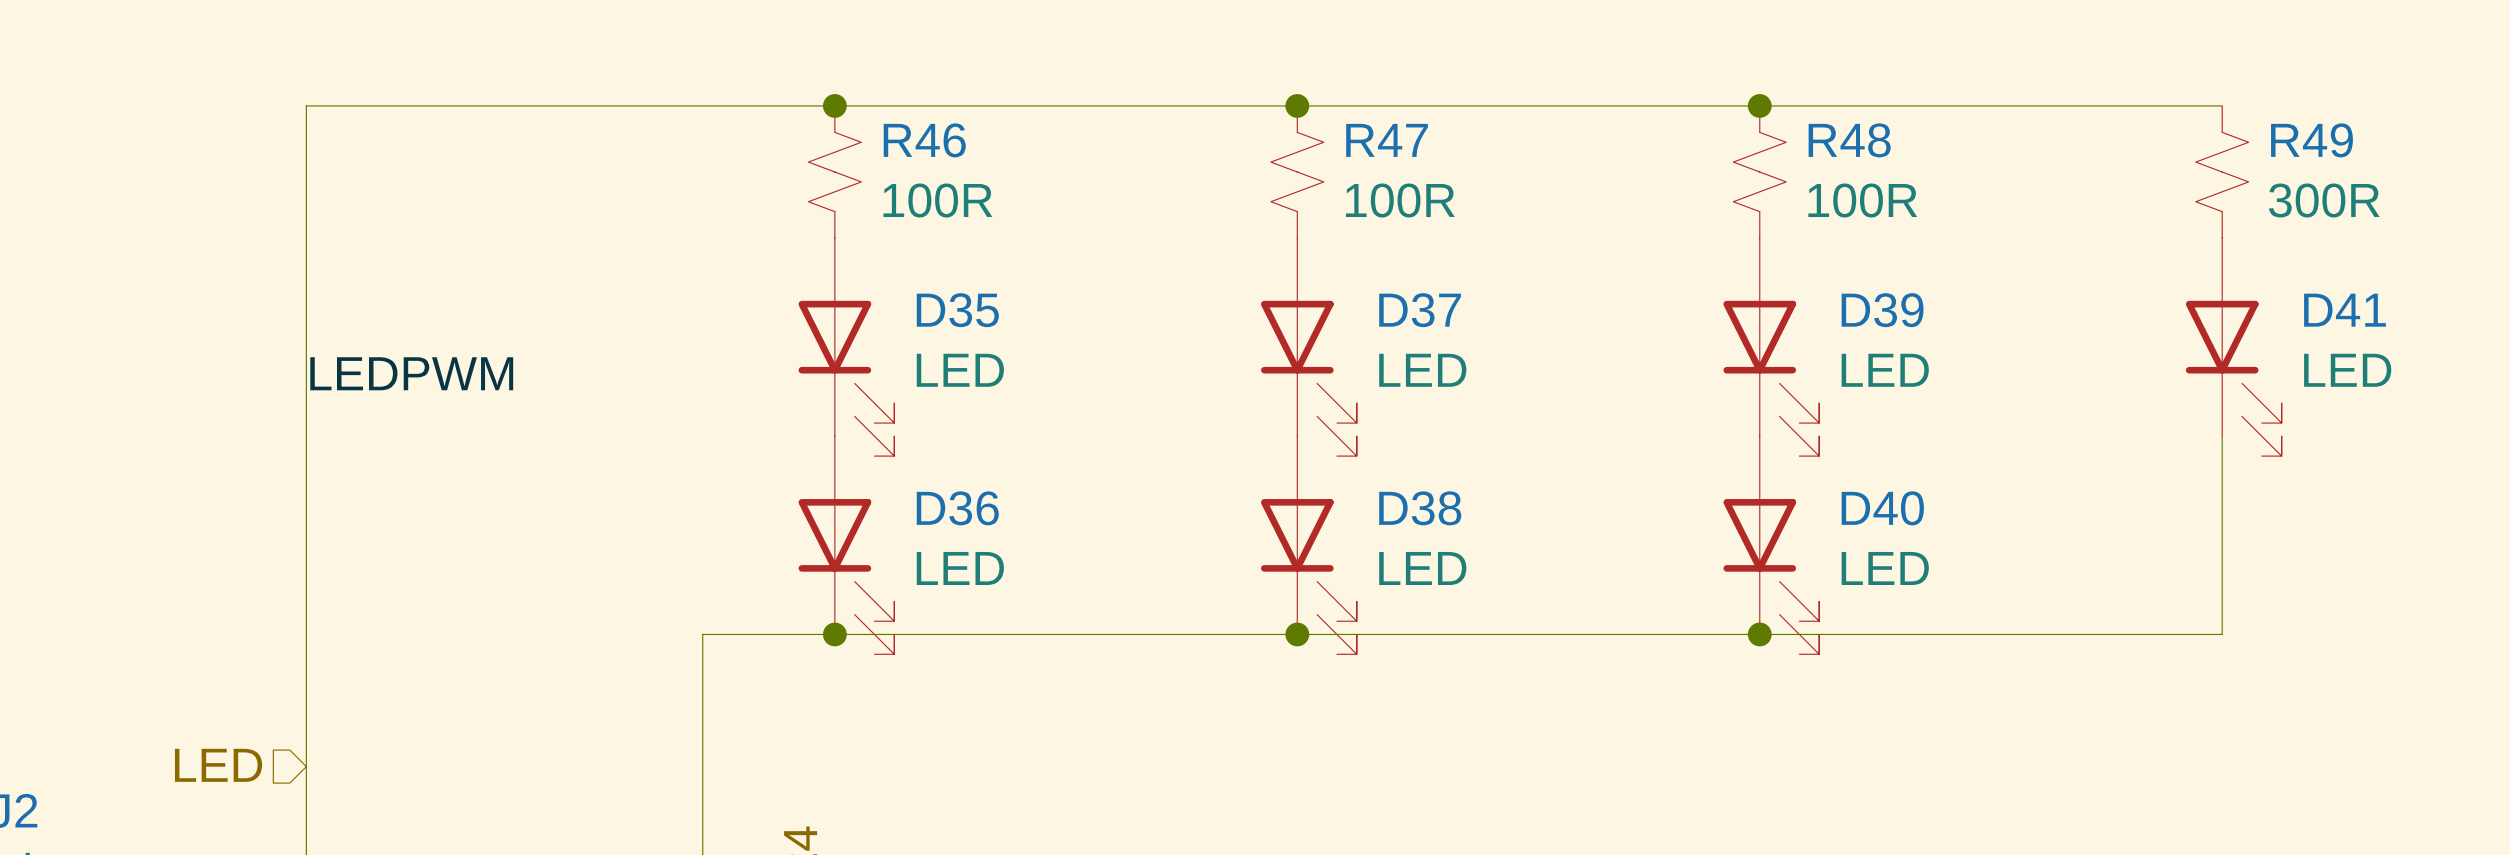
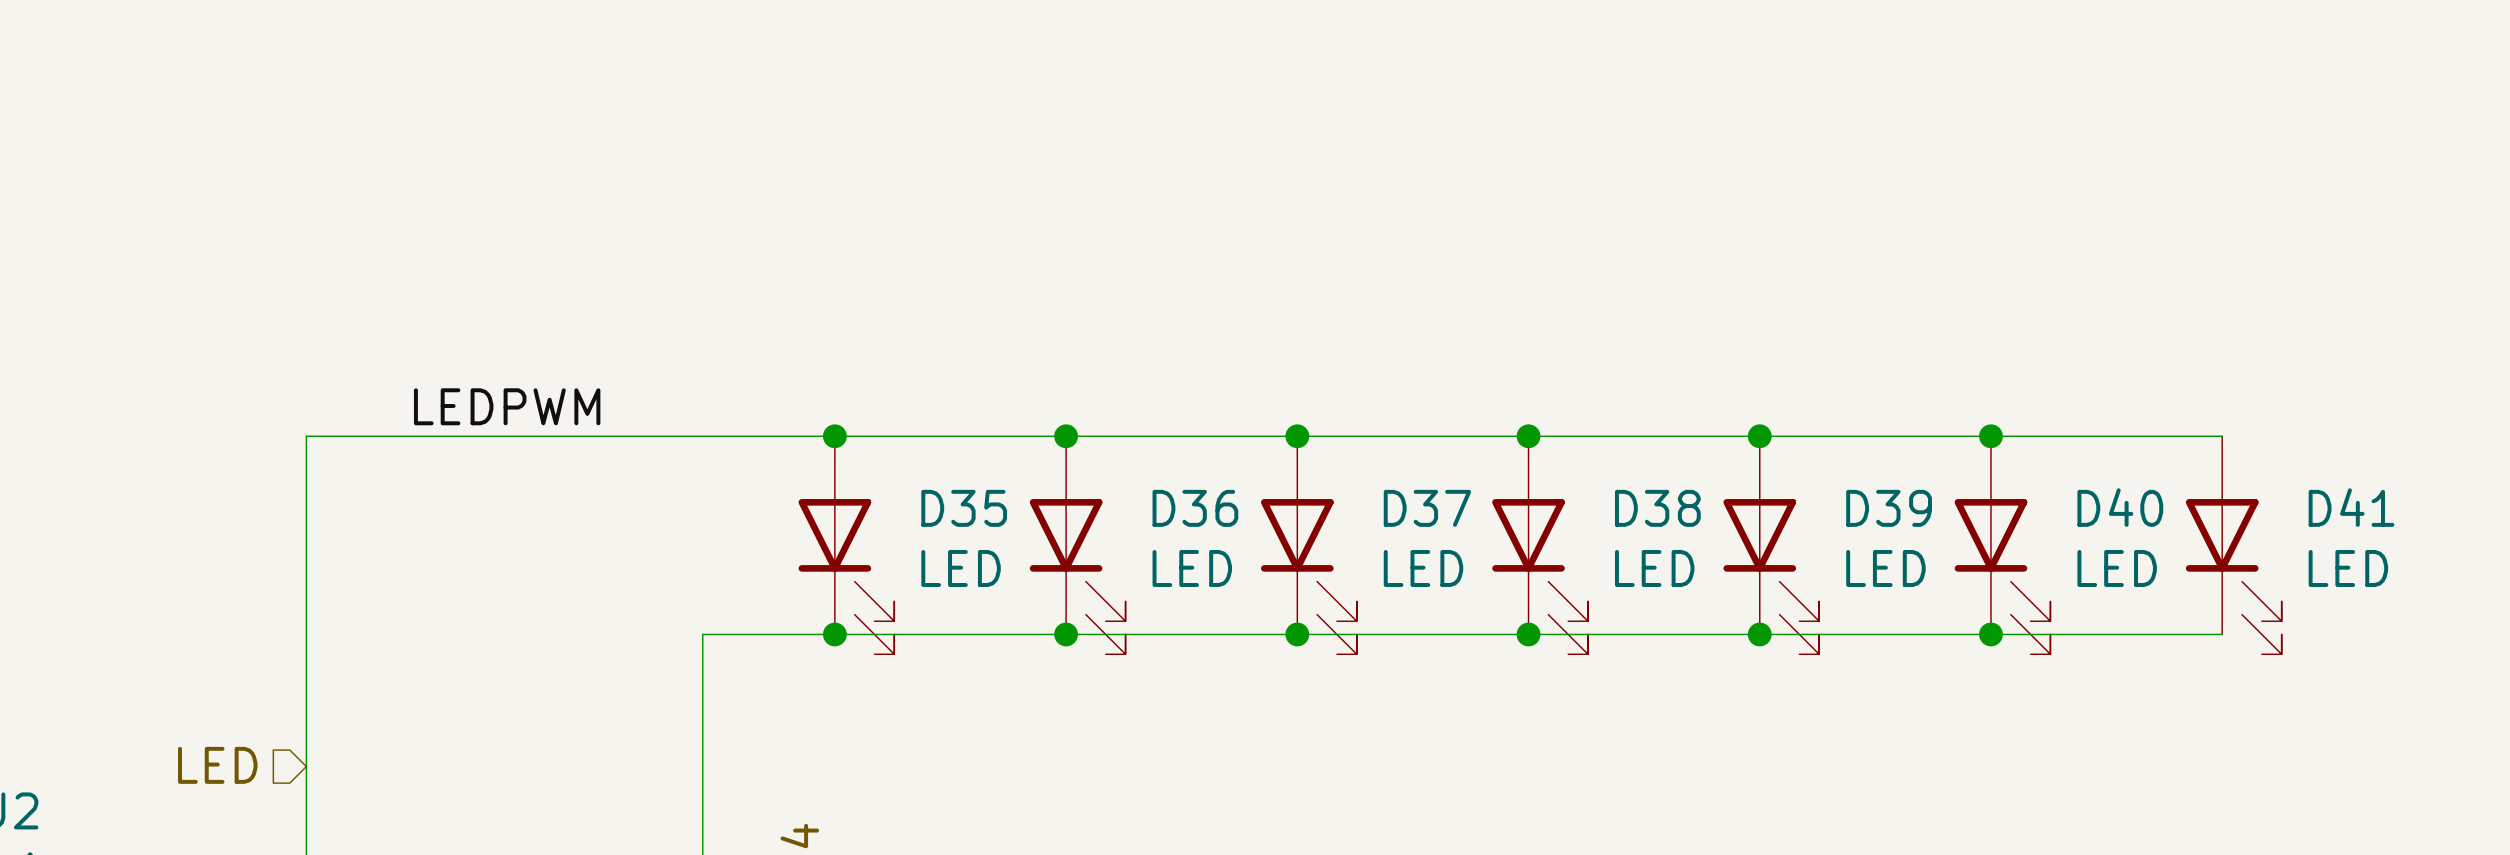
junction: (834, 105) -> none
junction: (1297, 105) -> none
junction: (1759, 105) -> none
wire: (2222, 105) (306, 105) (306, 436) -> (2222, 436) (306, 436)
R46: 100R (834, 172) -> none
R47: 100R (1297, 172) -> none
R48: 100R (1759, 172) -> none
R49: 300R (2222, 172) -> none
D35: LED (846, 347) -> none
D37: LED (1308, 347) -> none
D39: LED (1771, 347) -> none
D41 position: (2233, 347) -> (2233, 545)
label position: LEDPWM (411, 373) -> LEDPWM (507, 406)
junction: none -> (834, 436)
junction: none -> (1066, 436)
junction: none -> (1297, 436)
junction: none -> (1528, 436)
junction: none -> (1759, 436)
junction: none -> (1990, 436)
D36 name: D36 (957, 508) -> D35 (964, 508)
D38 name: D38 (1420, 508) -> D37 (1427, 508)
D40 name: D40 (1882, 508) -> D39 (1889, 508)
D36: none -> LED (1077, 545)
D38: none -> LED (1540, 545)
D40: none -> LED (2002, 545)
junction: none -> (1066, 634)
junction: none -> (1528, 634)
junction: none -> (1990, 634)

